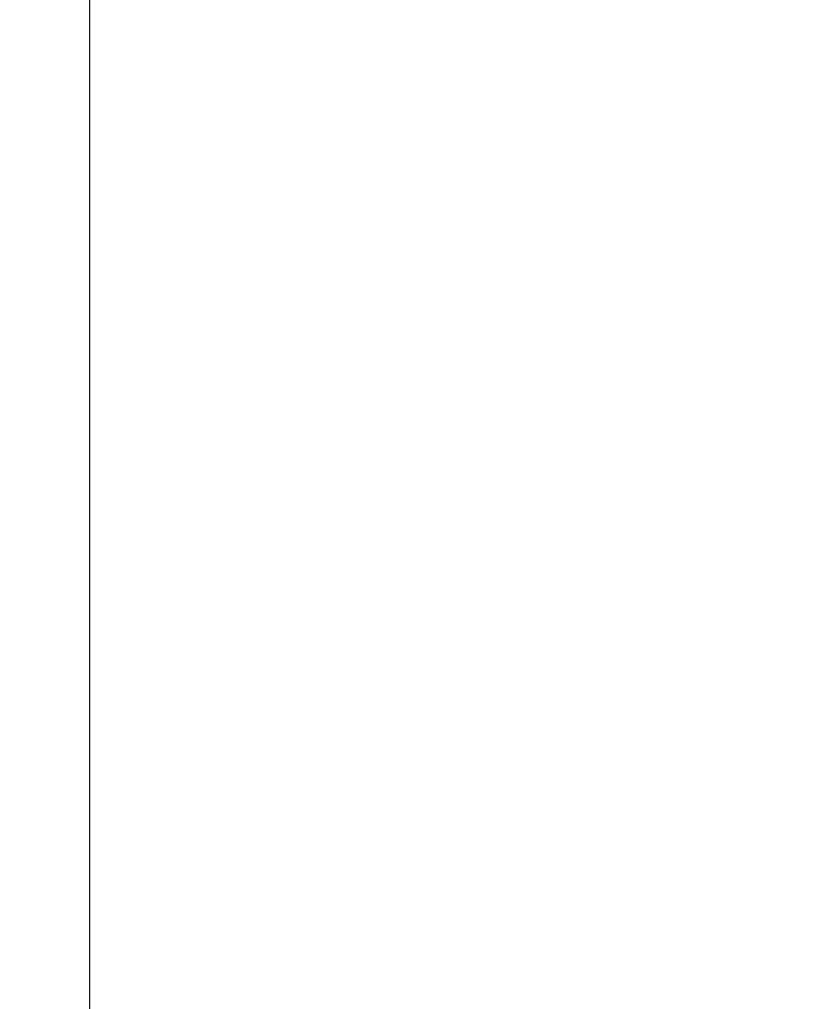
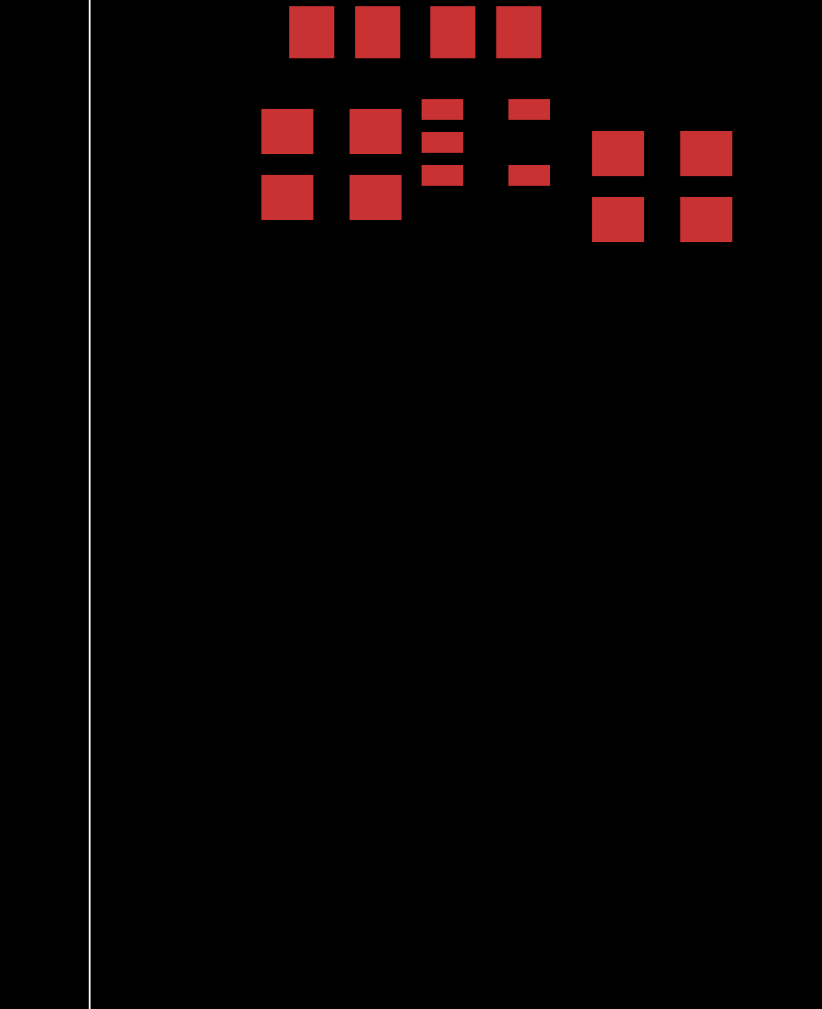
part: none -> (344, 32)
part: none -> (485, 32)
part: none -> (485, 142)
part: none -> (287, 164)
part: none -> (375, 164)
part: none -> (618, 186)
part: none -> (706, 186)

